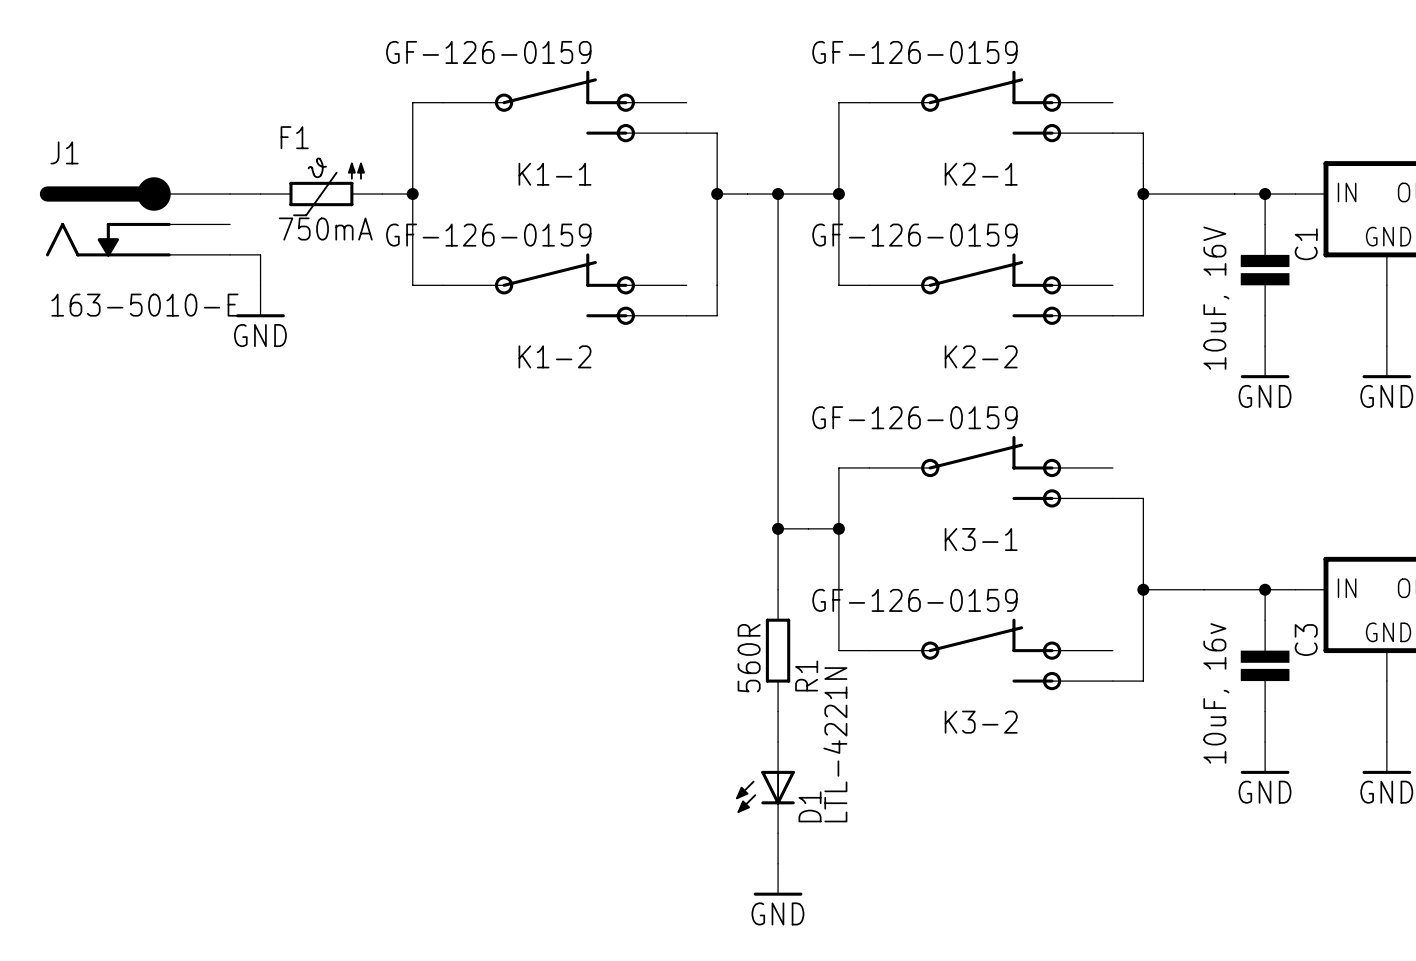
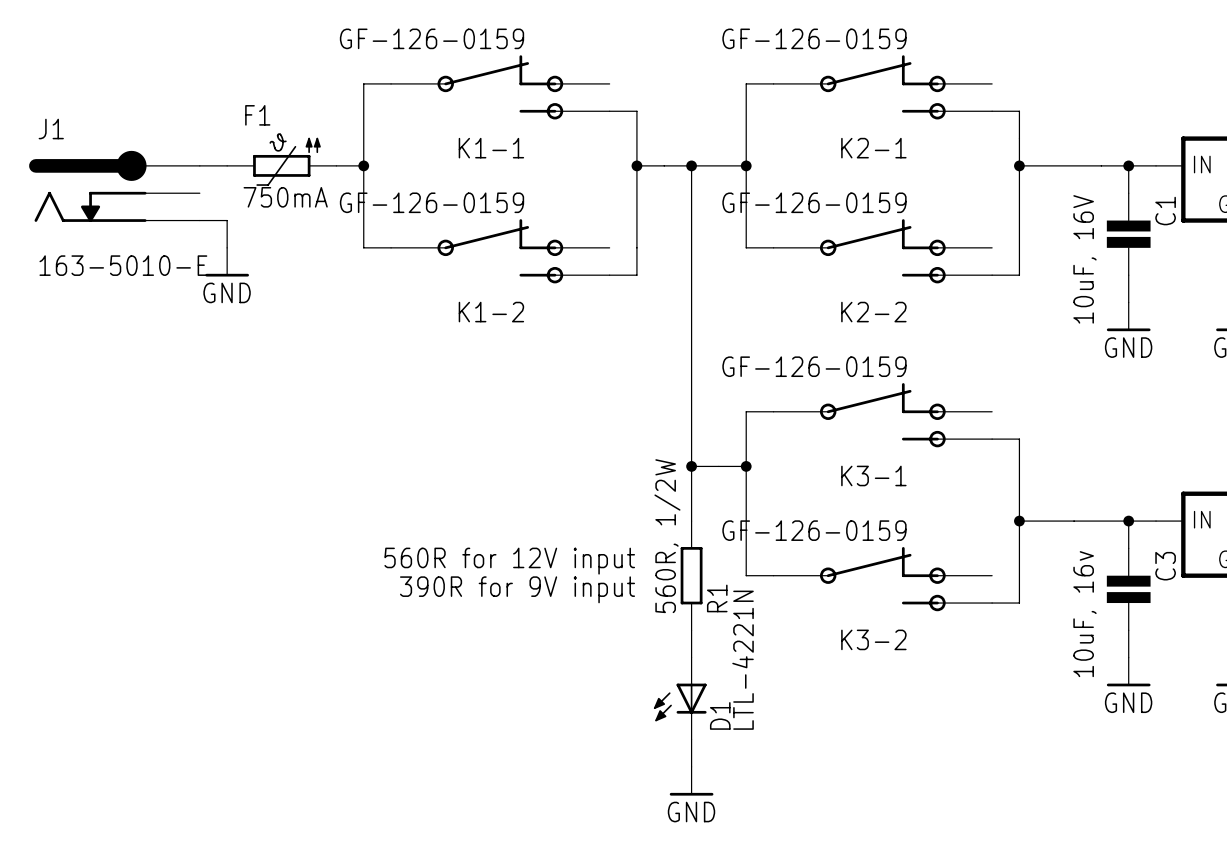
text: none -> 560R for 12V input (509, 561)
R1 value: 560R (749, 658) -> 560R, 1/2W (667, 536)
text: none -> 390R for 9V input (517, 589)

